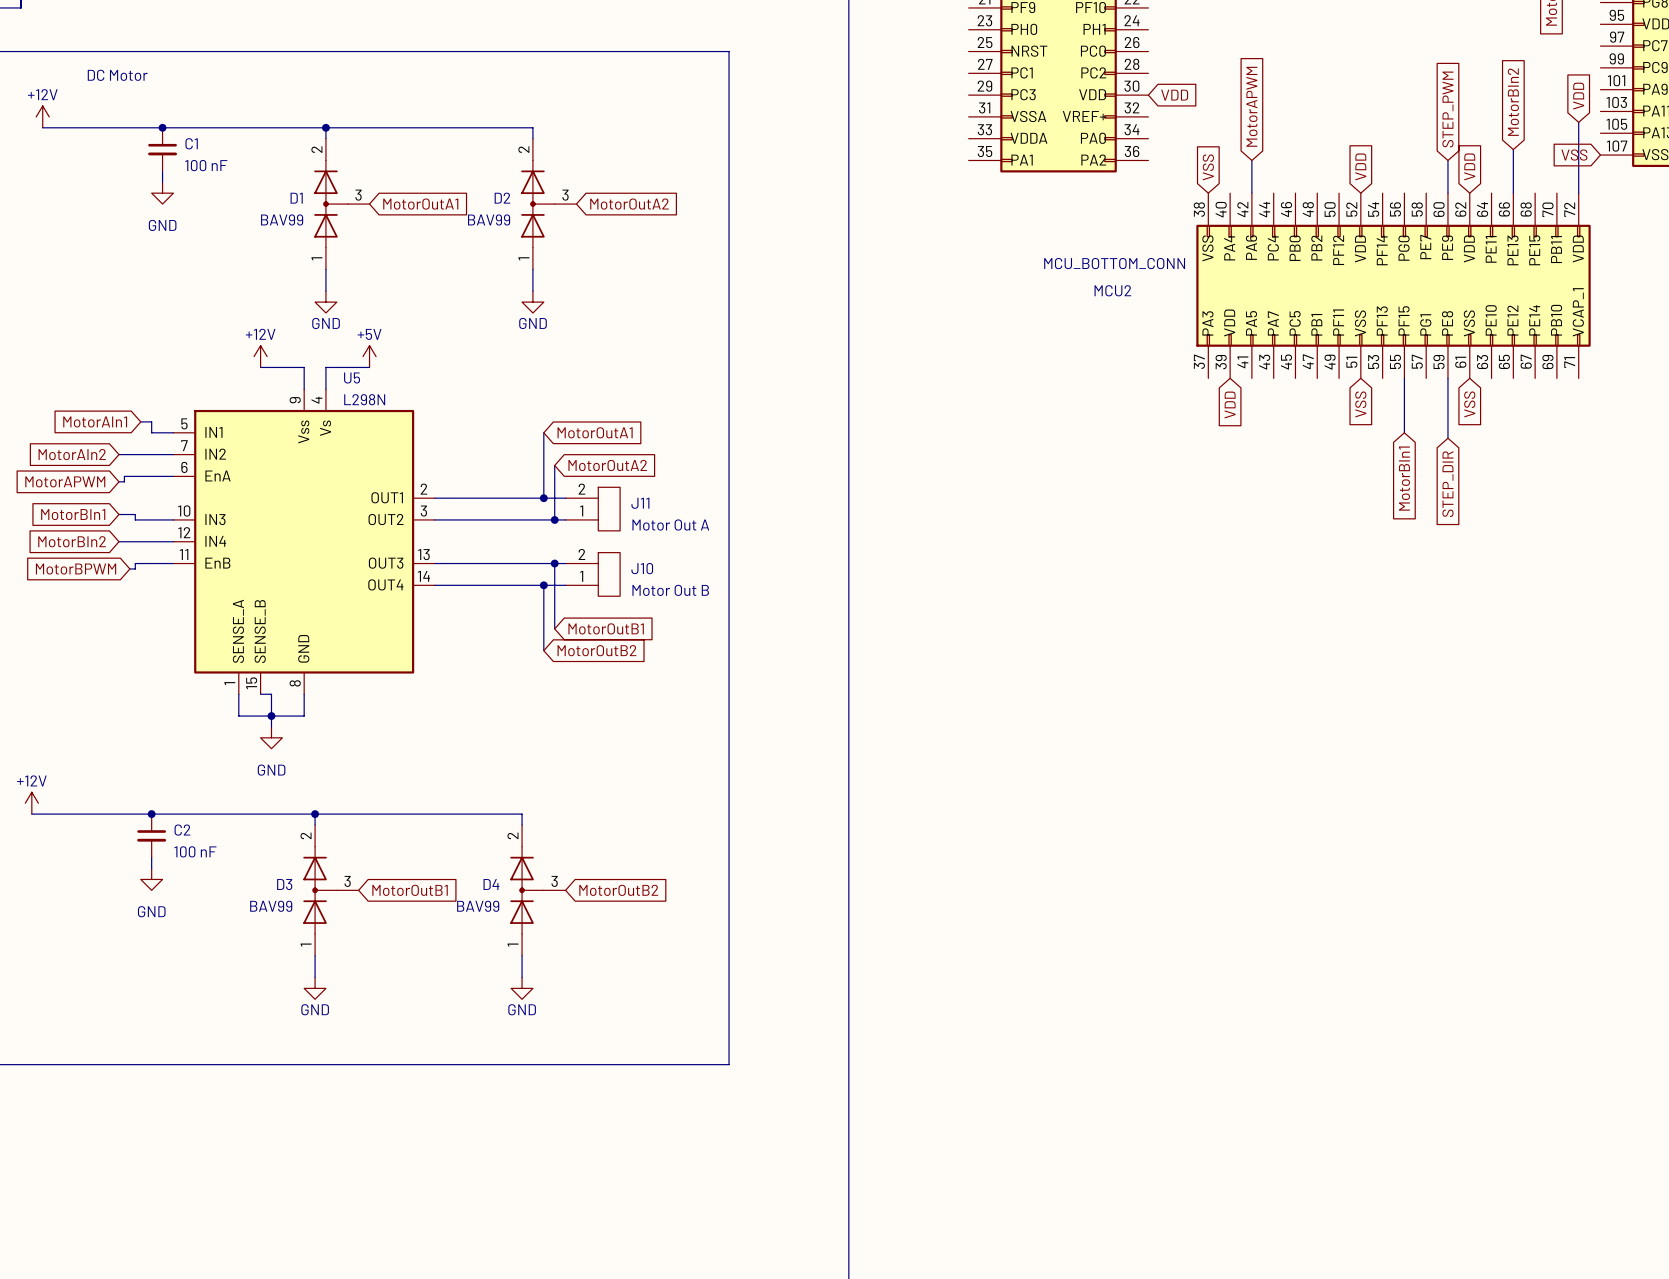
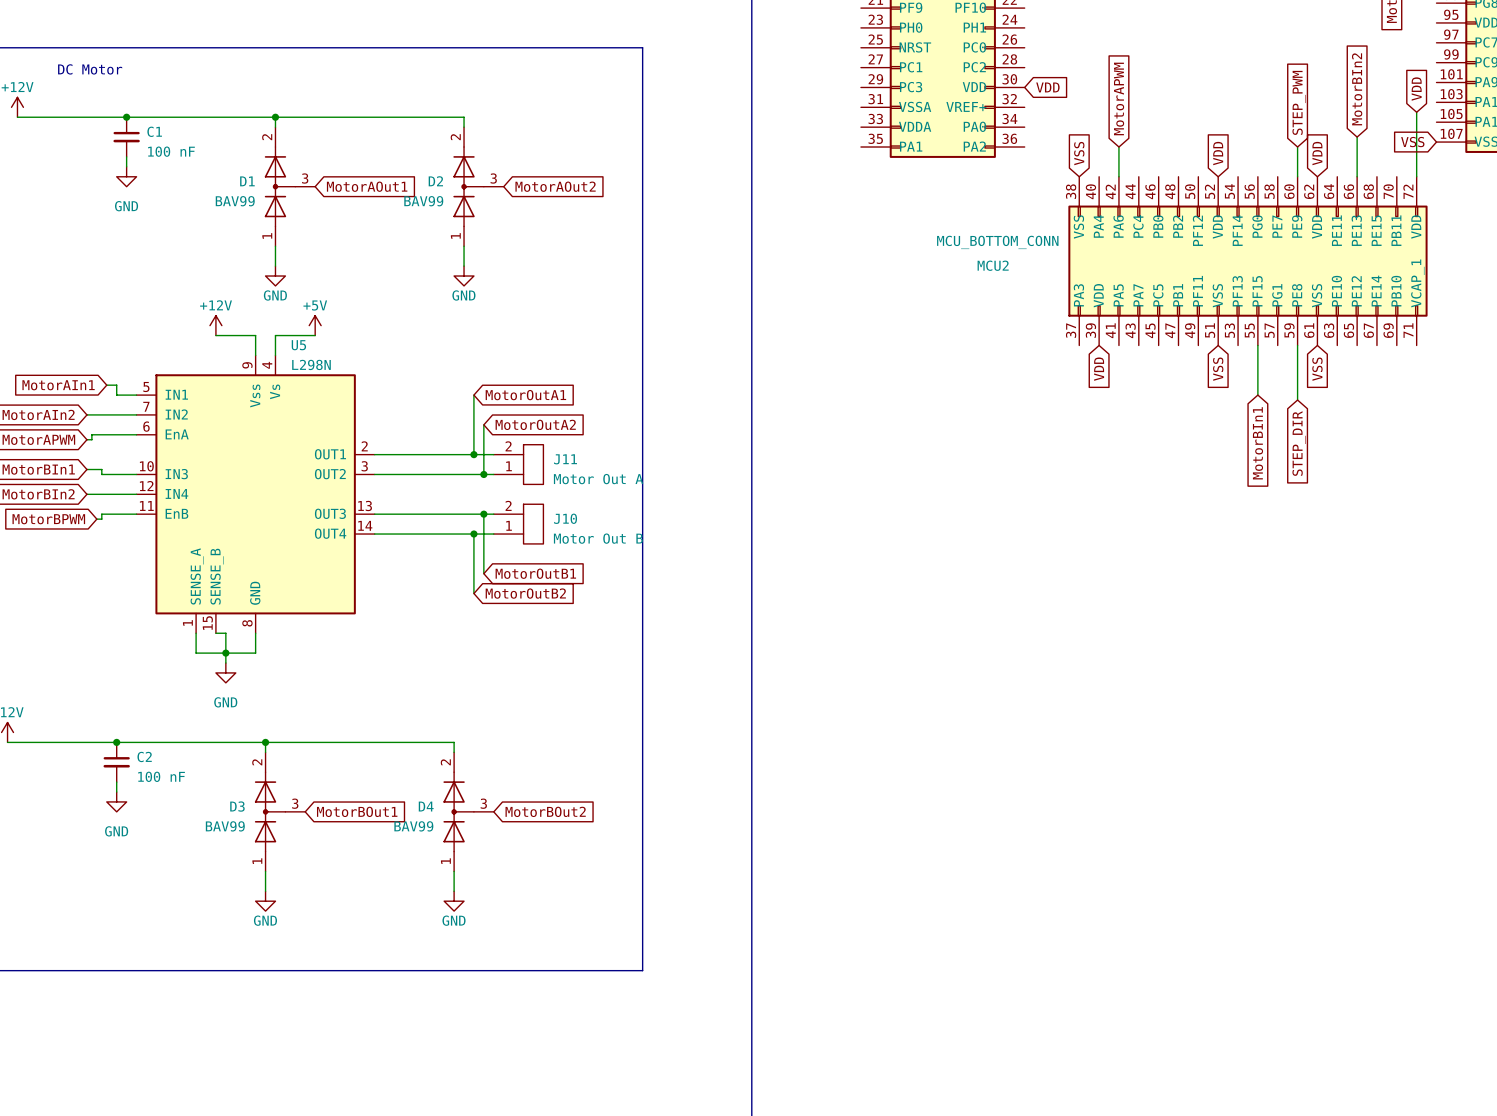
global label: MotorOutA1 (420, 204) -> MotorAOut1 (367, 186)
global label: MotorOutA2 (629, 204) -> MotorAOut2 (555, 186)
global label: MotorOutB1 (410, 890) -> MotorBOut1 (357, 811)
global label: MotorOutB2 (618, 890) -> MotorBOut2 (545, 811)

